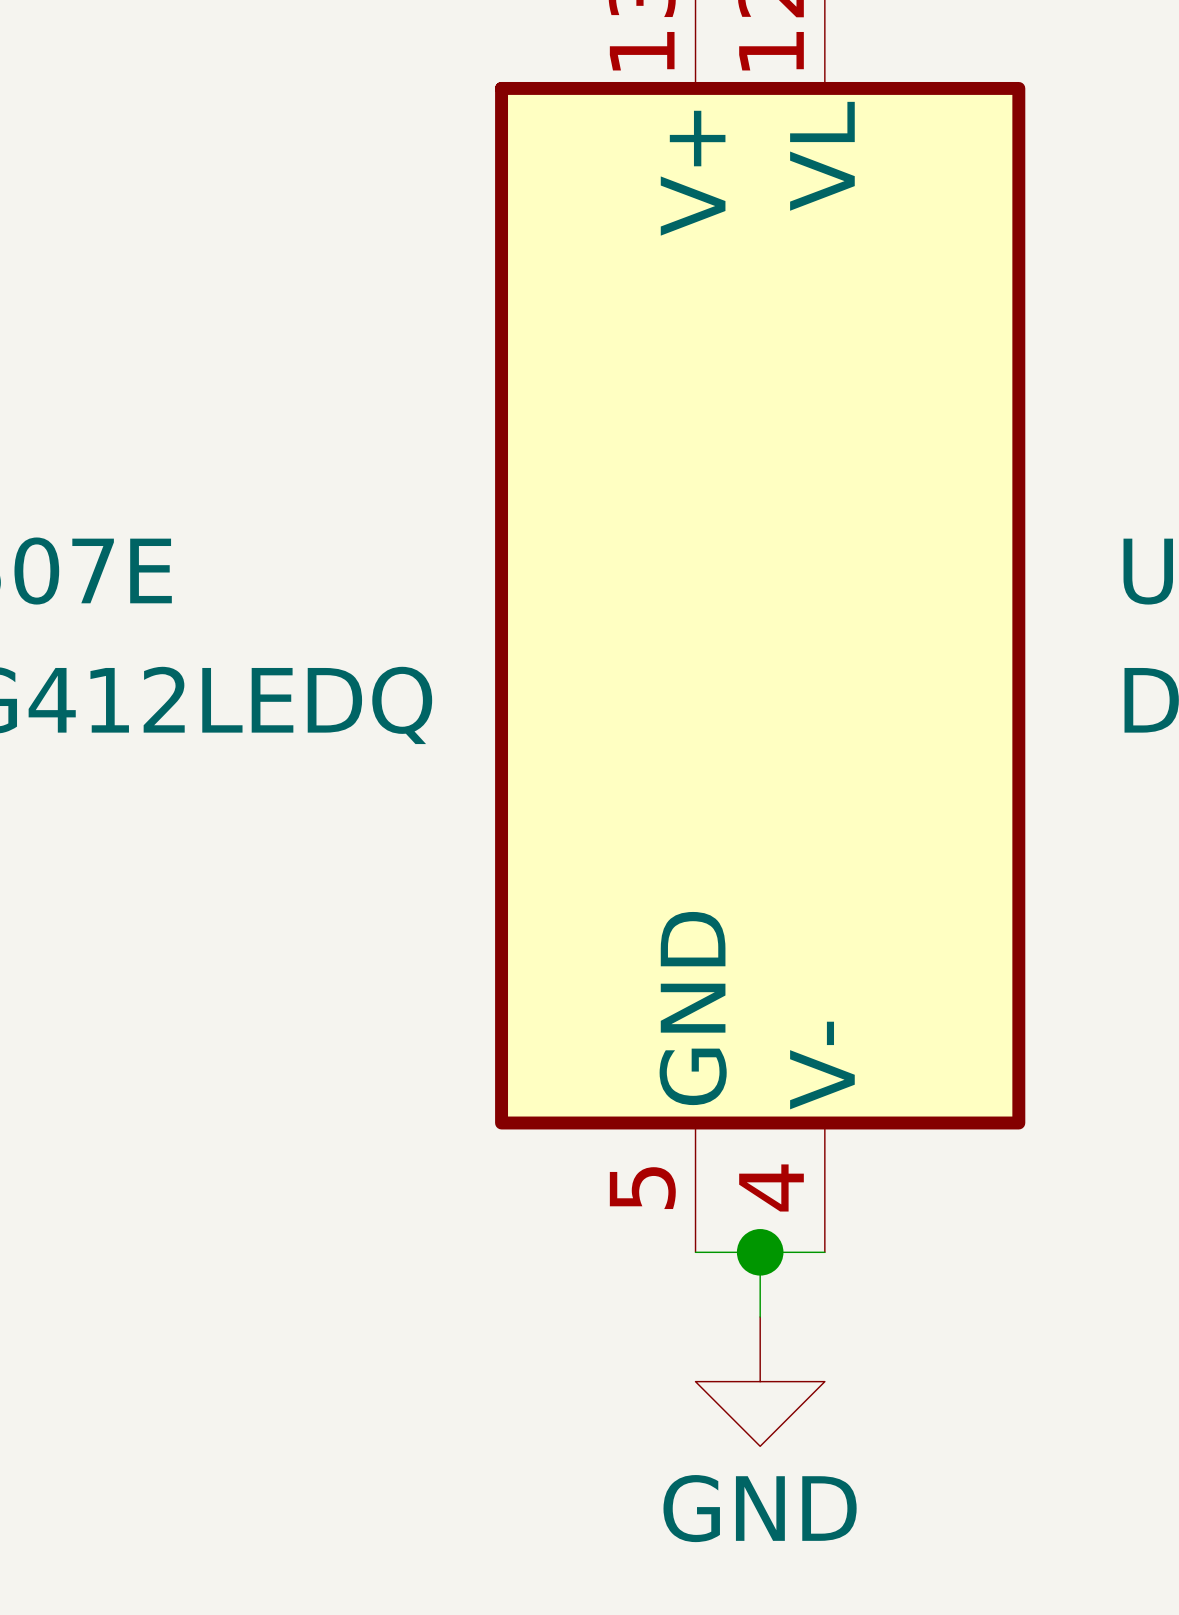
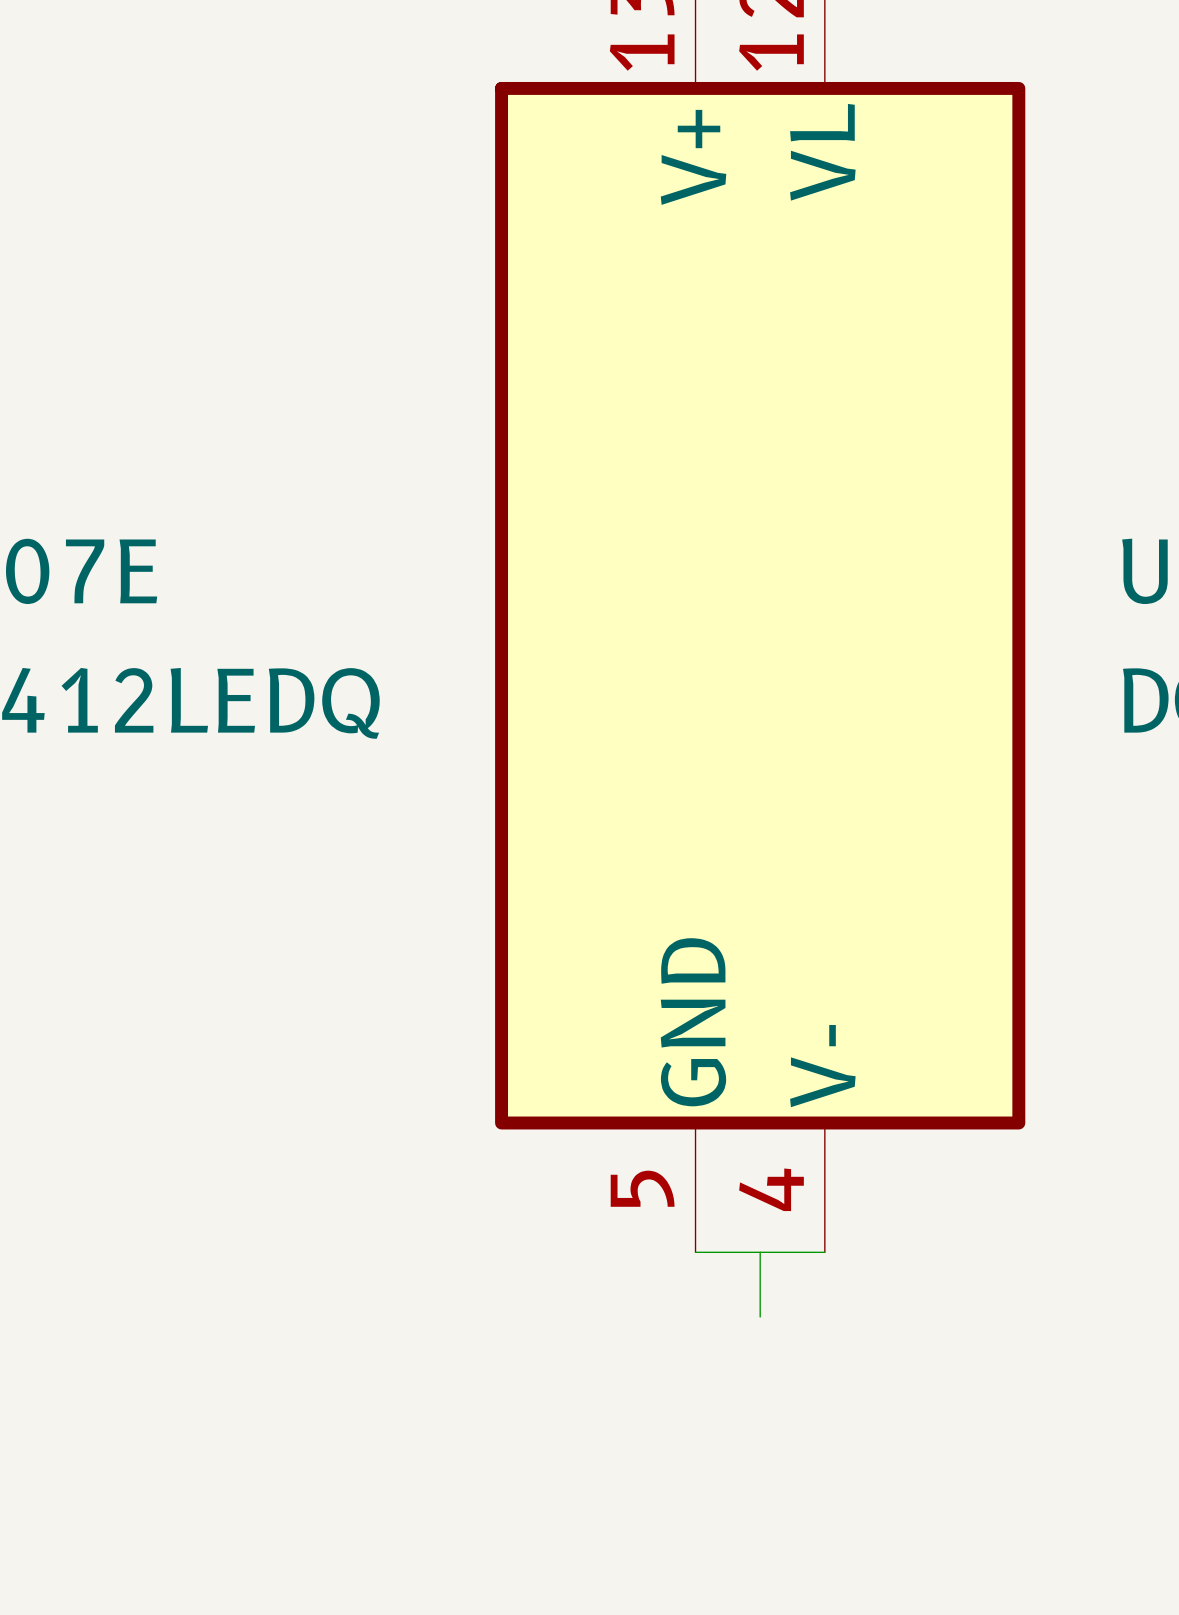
junction: (760, 1252) -> none
power symbol: GND (760, 1381) -> none

